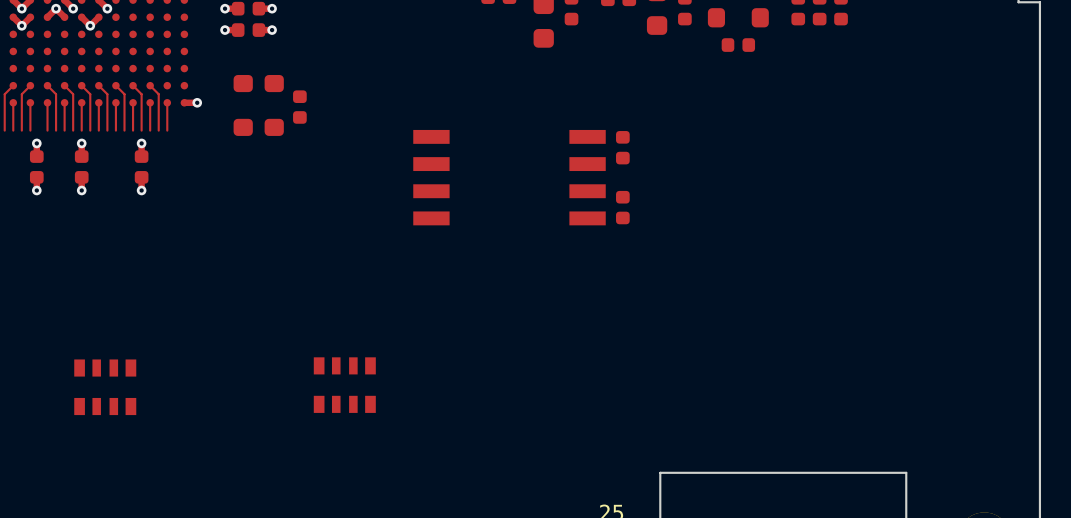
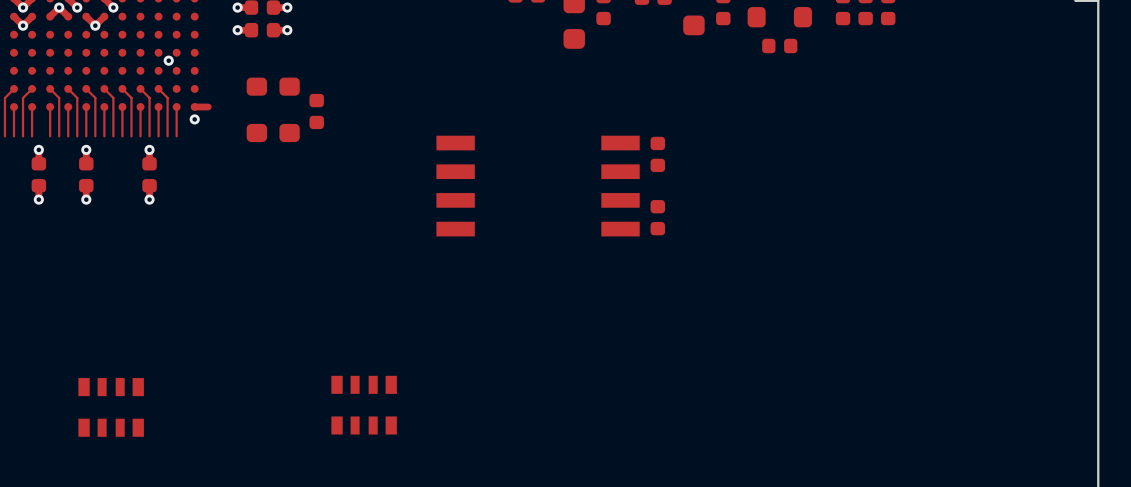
via: none -> (168, 60)
via position: (197, 102) -> (194, 119)

